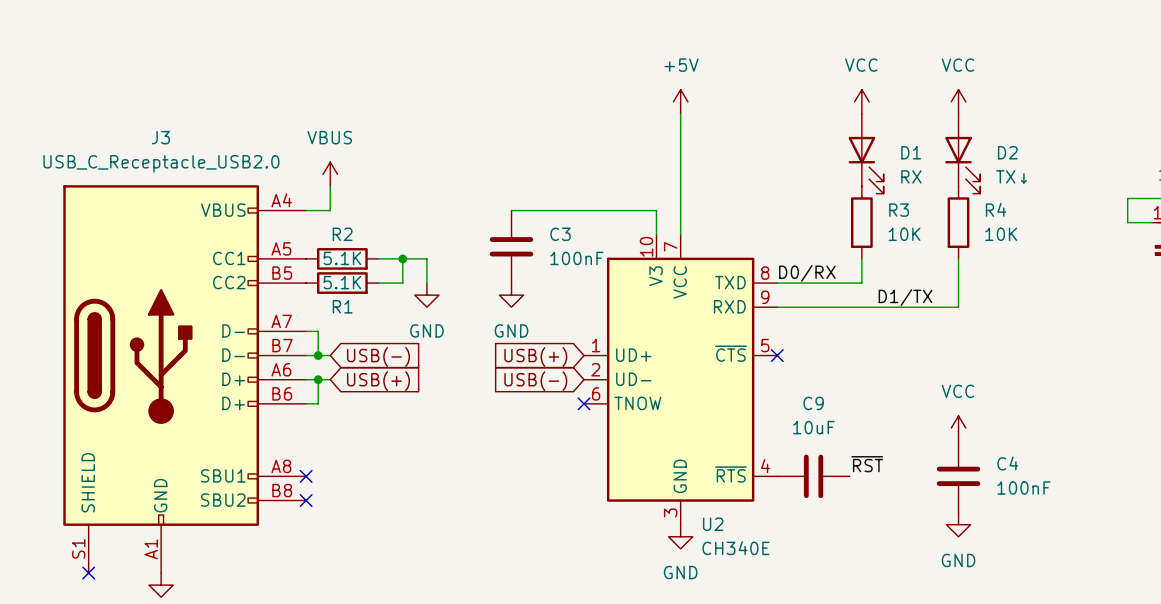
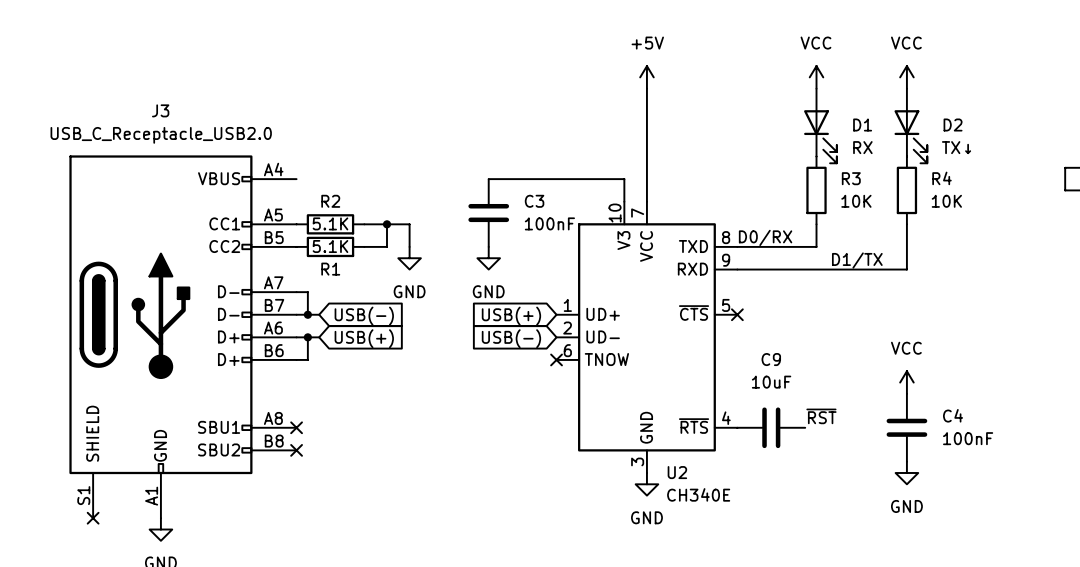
power symbol: VBUS (330, 174) -> none
wire: (330, 186) (330, 210) (306, 210) -> none

